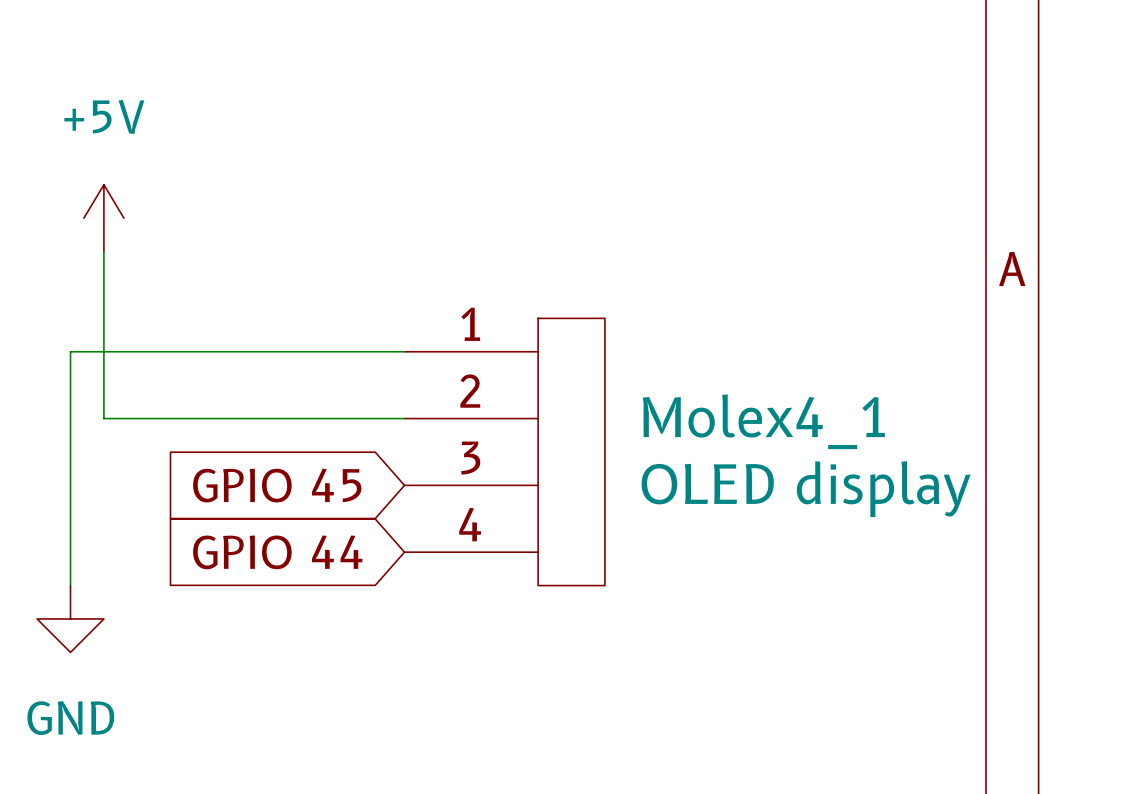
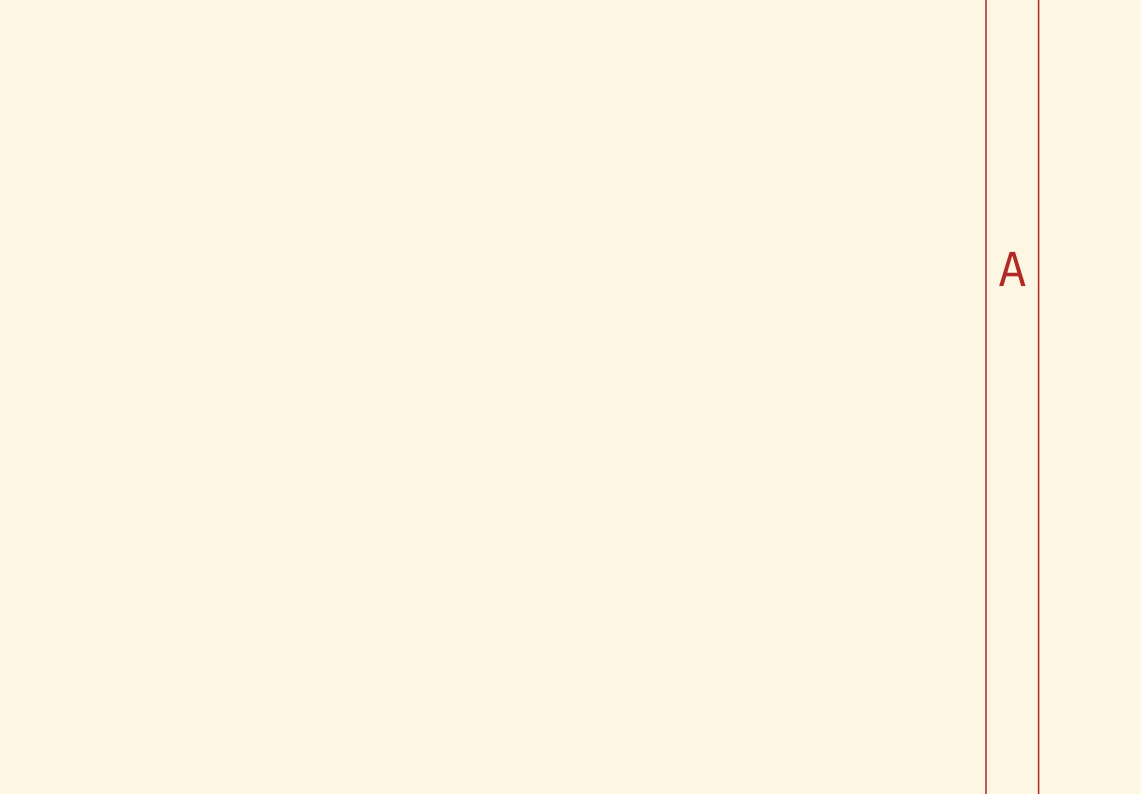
power symbol: +5V (103, 218) -> none
wire: (103, 251) (103, 418) (404, 418) -> none
wire: (404, 351) (70, 351) (70, 585) -> none
Molex4_1: OLED display (504, 451) -> none
global label: GPIO 45 (277, 485) -> none
global label: GPIO 44 (277, 552) -> none
power symbol: GND (70, 618) -> none

